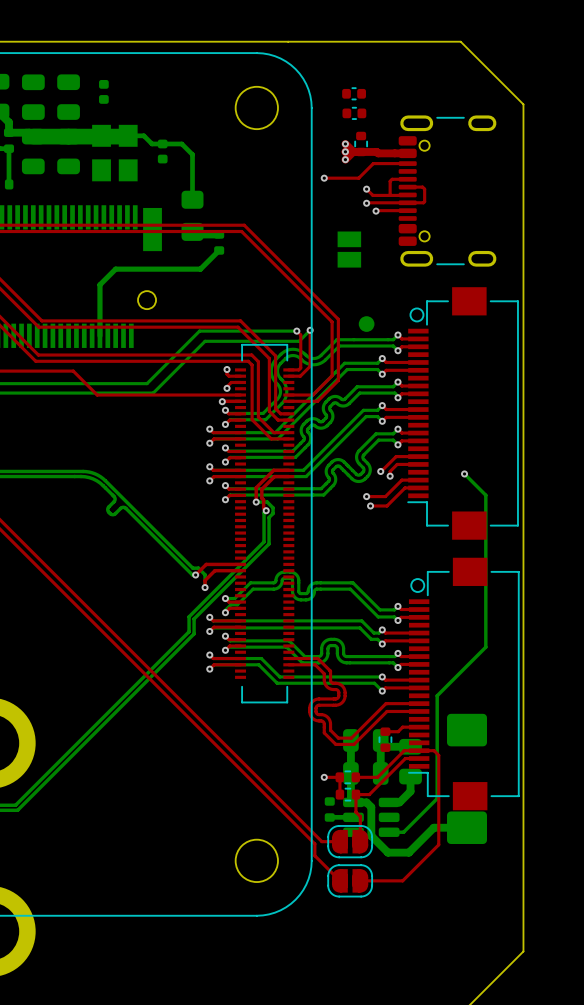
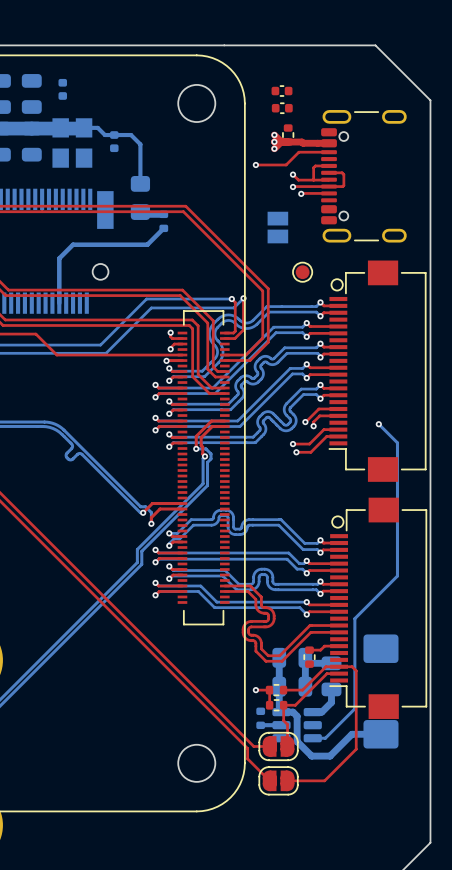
part side: bottom (366, 324) -> top (302, 272)

